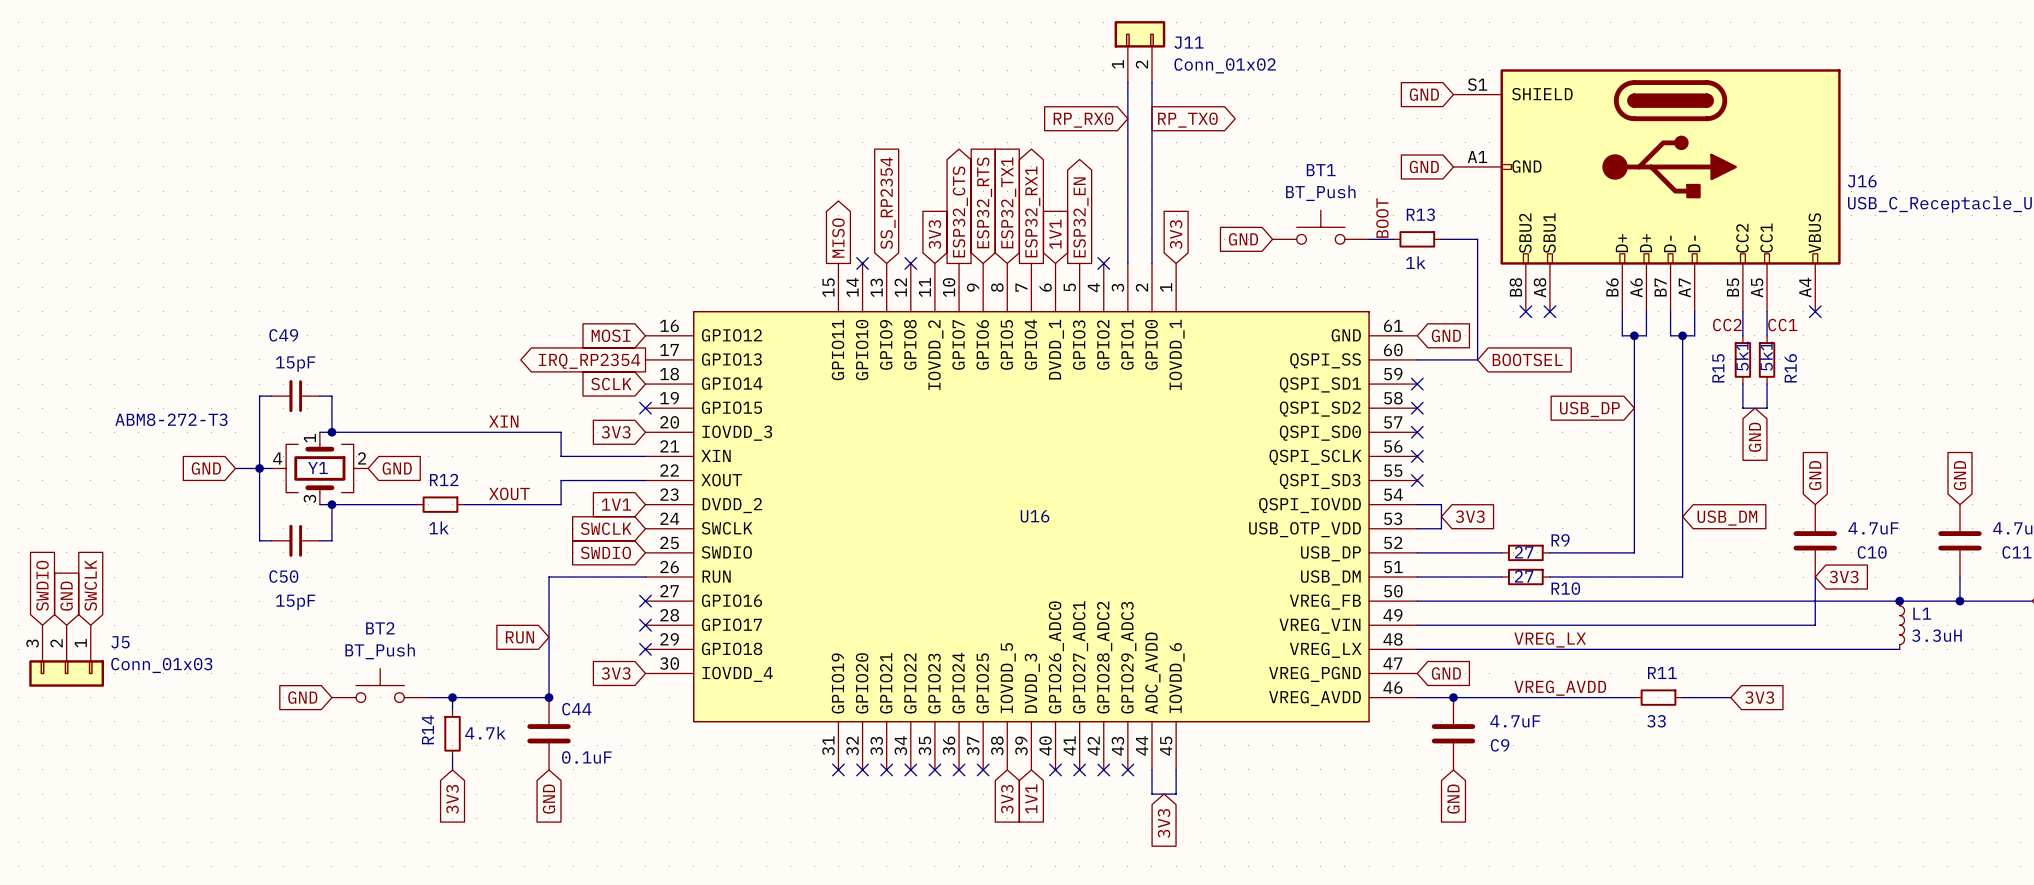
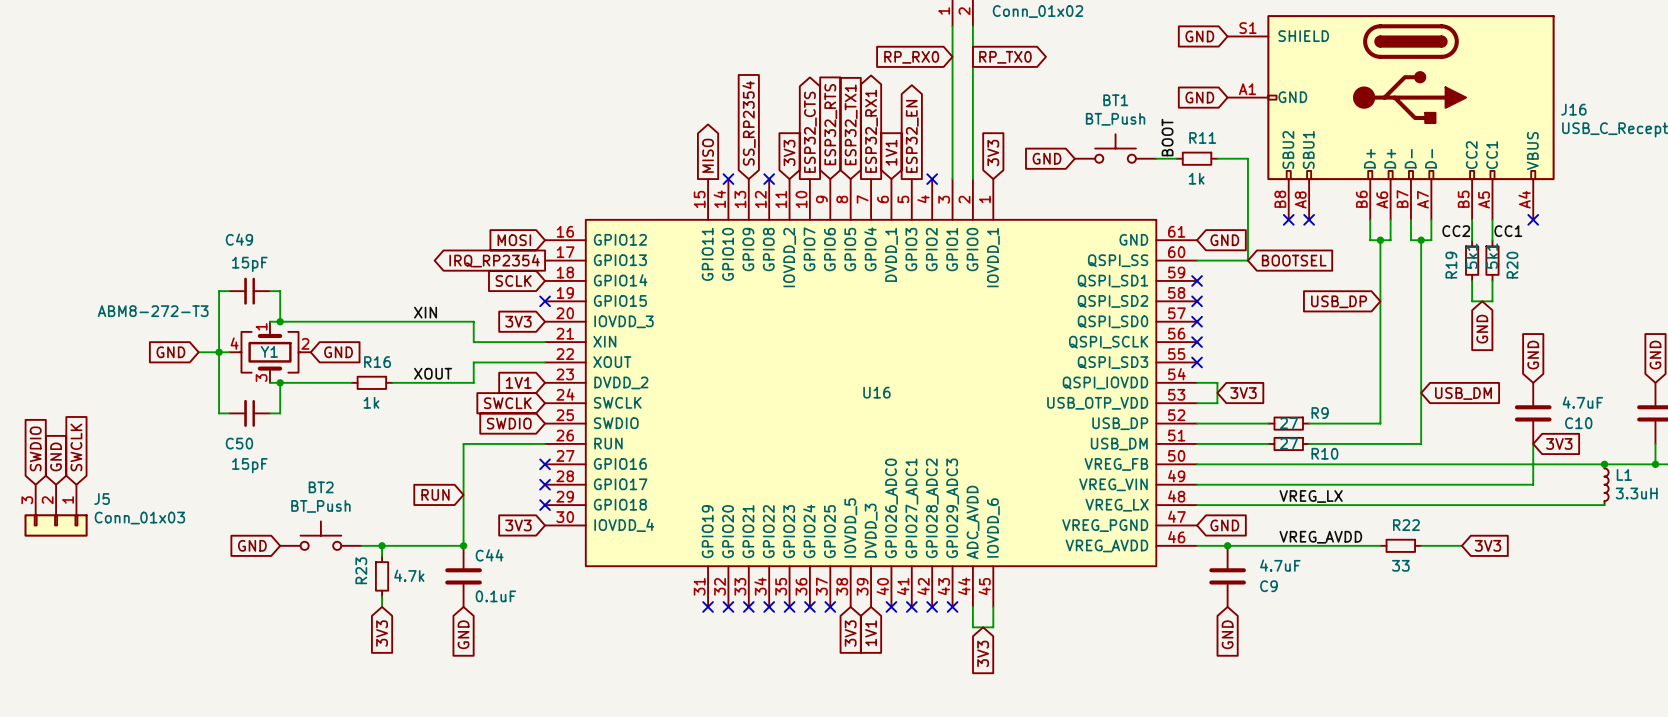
R13 name: R13 (1420, 214) -> R11 (1202, 137)
R15 name: R15 (1718, 368) -> R19 (1451, 265)
R16 name: R16 (1790, 368) -> R20 (1512, 265)
R12 name: R12 (444, 479) -> R16 (377, 362)
R11 name: R11 (1662, 673) -> R22 (1406, 525)
R14 name: R14 (427, 729) -> R23 (361, 570)

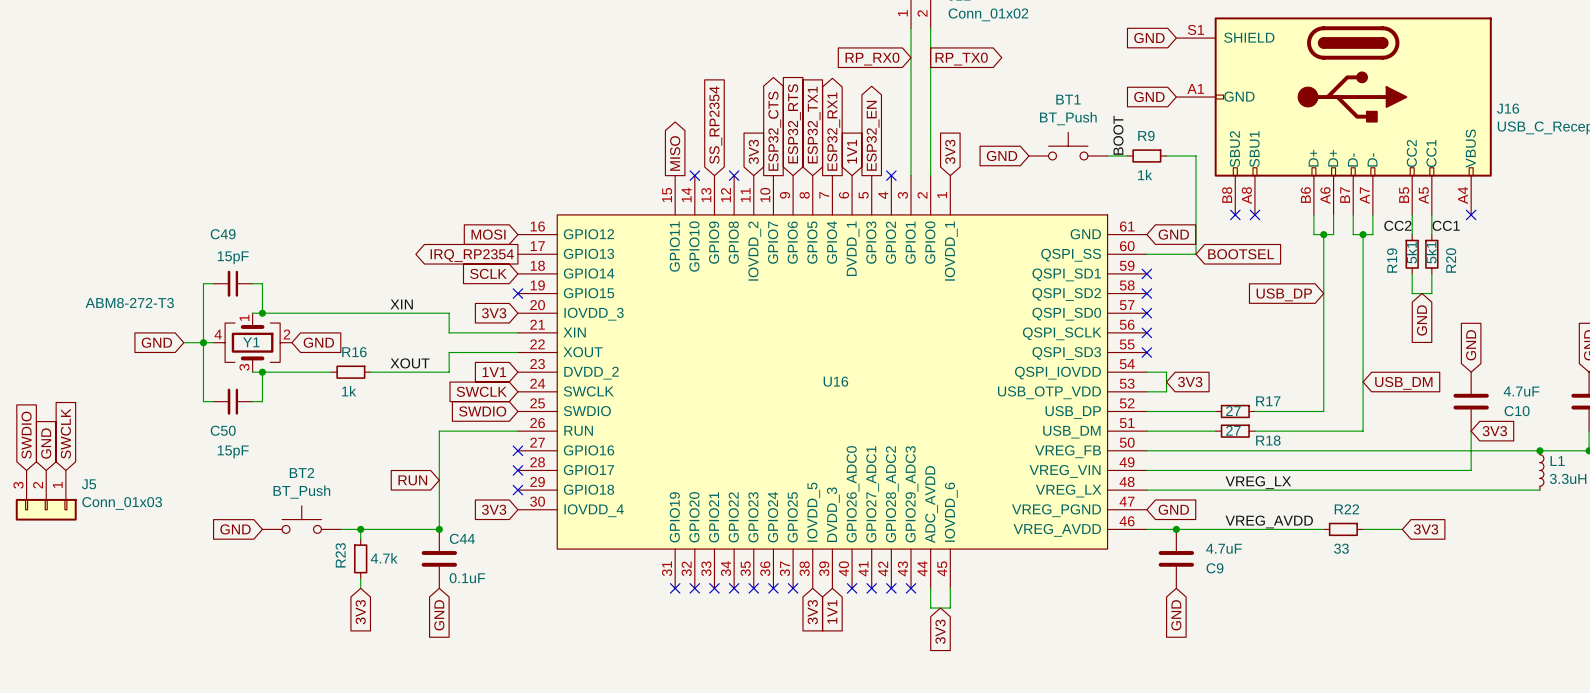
R11 name: R11 (1202, 137) -> R9 (1146, 135)
R9 name: R9 (1320, 413) -> R17 (1268, 401)
R10 name: R10 (1324, 453) -> R18 (1268, 440)

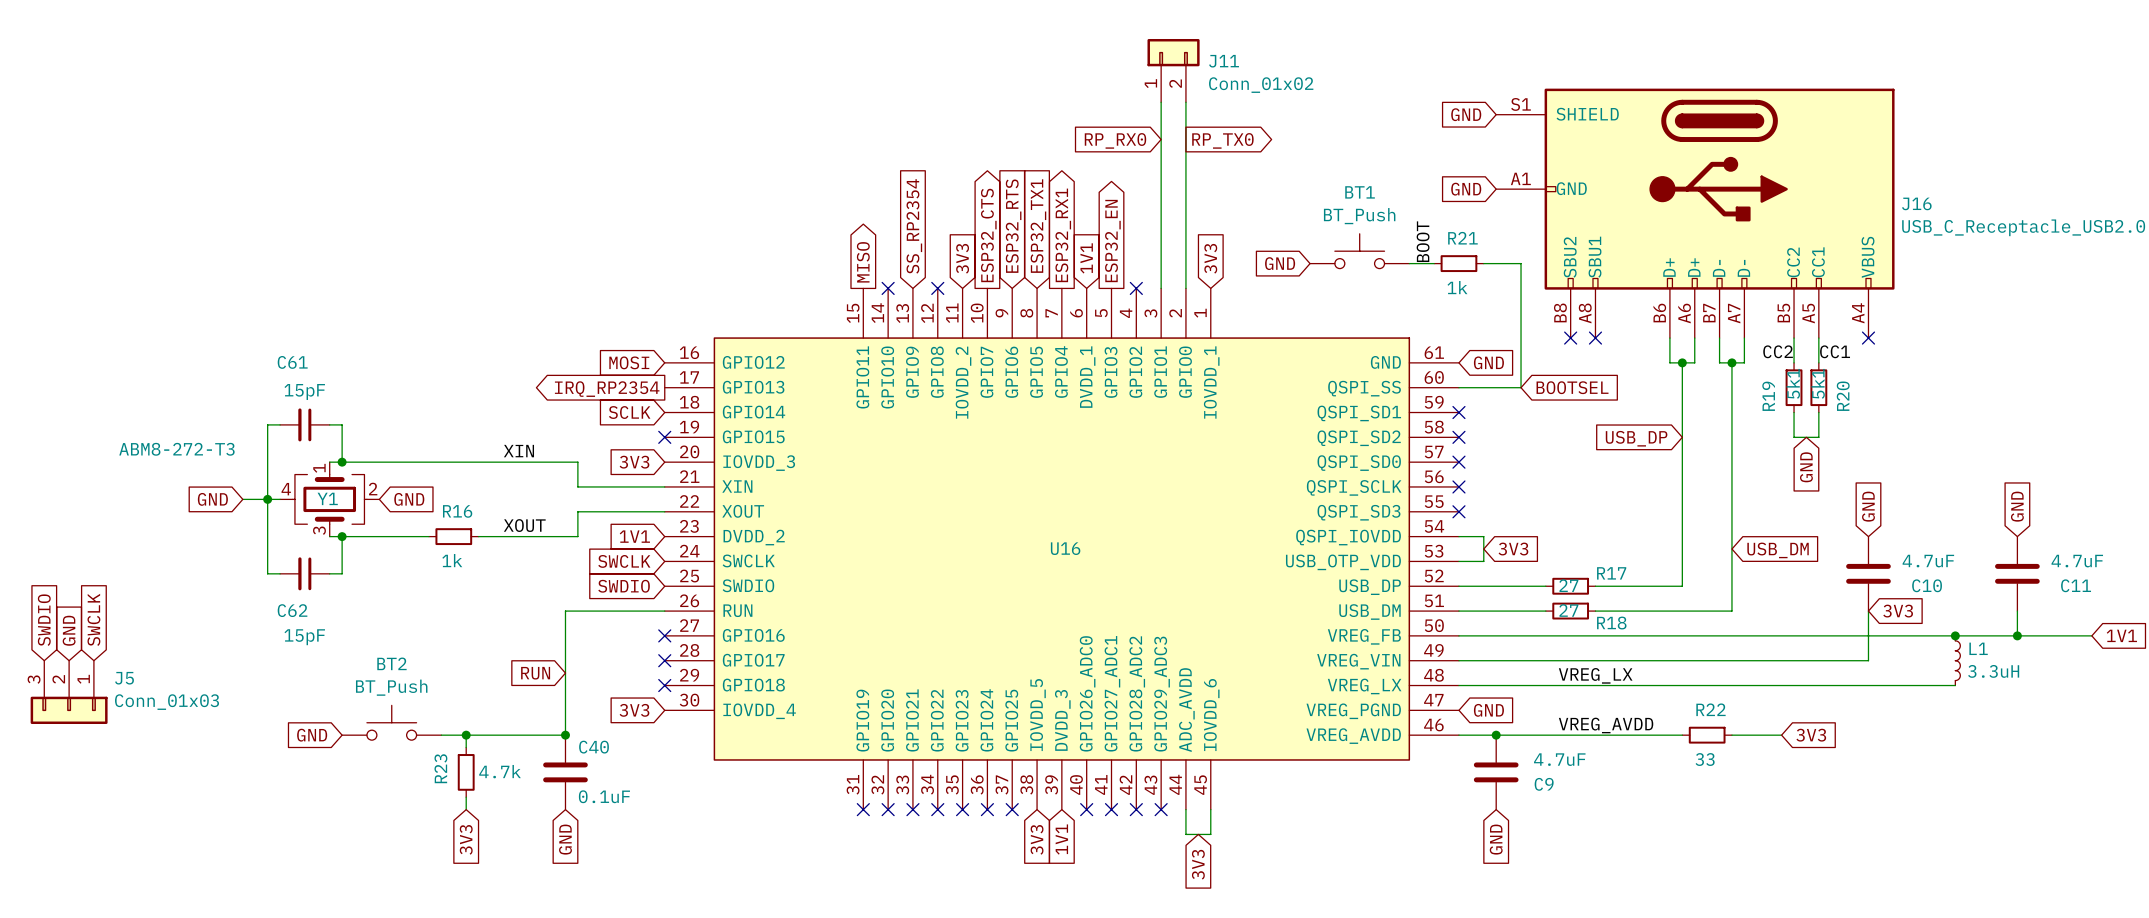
R9 name: R9 (1146, 135) -> R21 (1462, 238)
C49 name: C49 (223, 234) -> C61 (292, 362)
C50 name: C50 (223, 430) -> C62 (292, 610)
C44 name: C44 (462, 538) -> C40 (594, 747)

